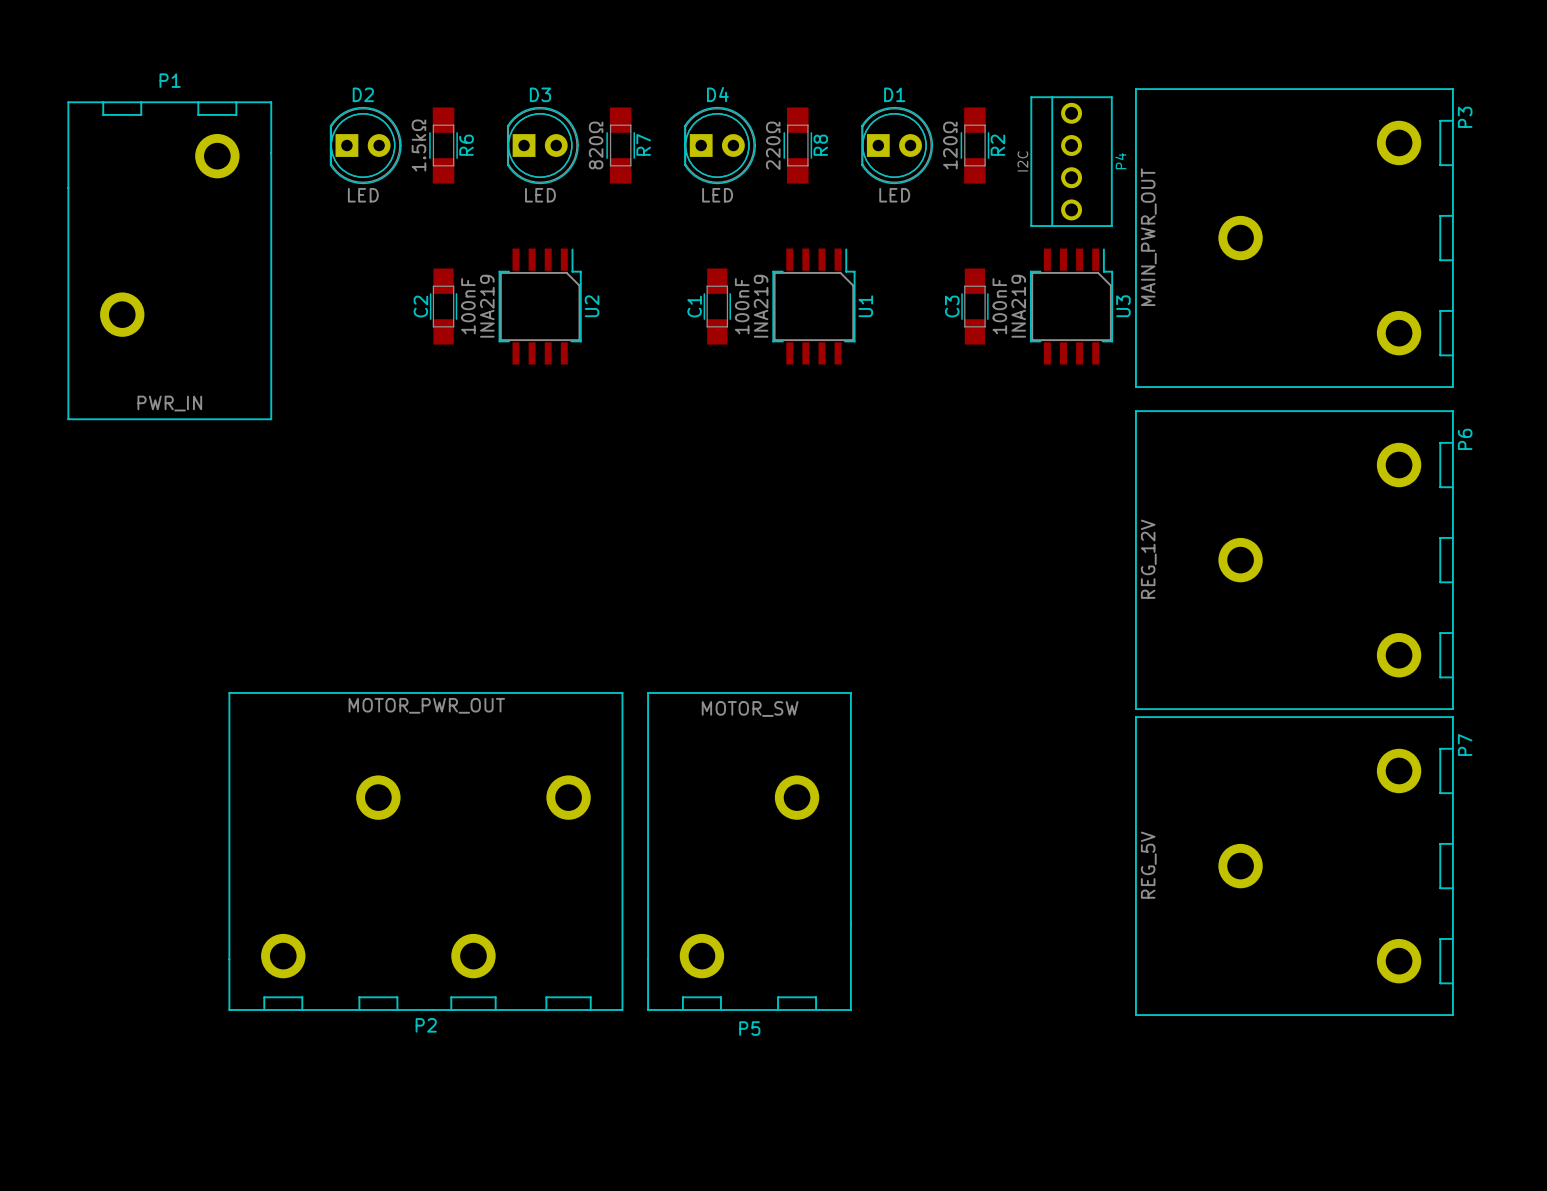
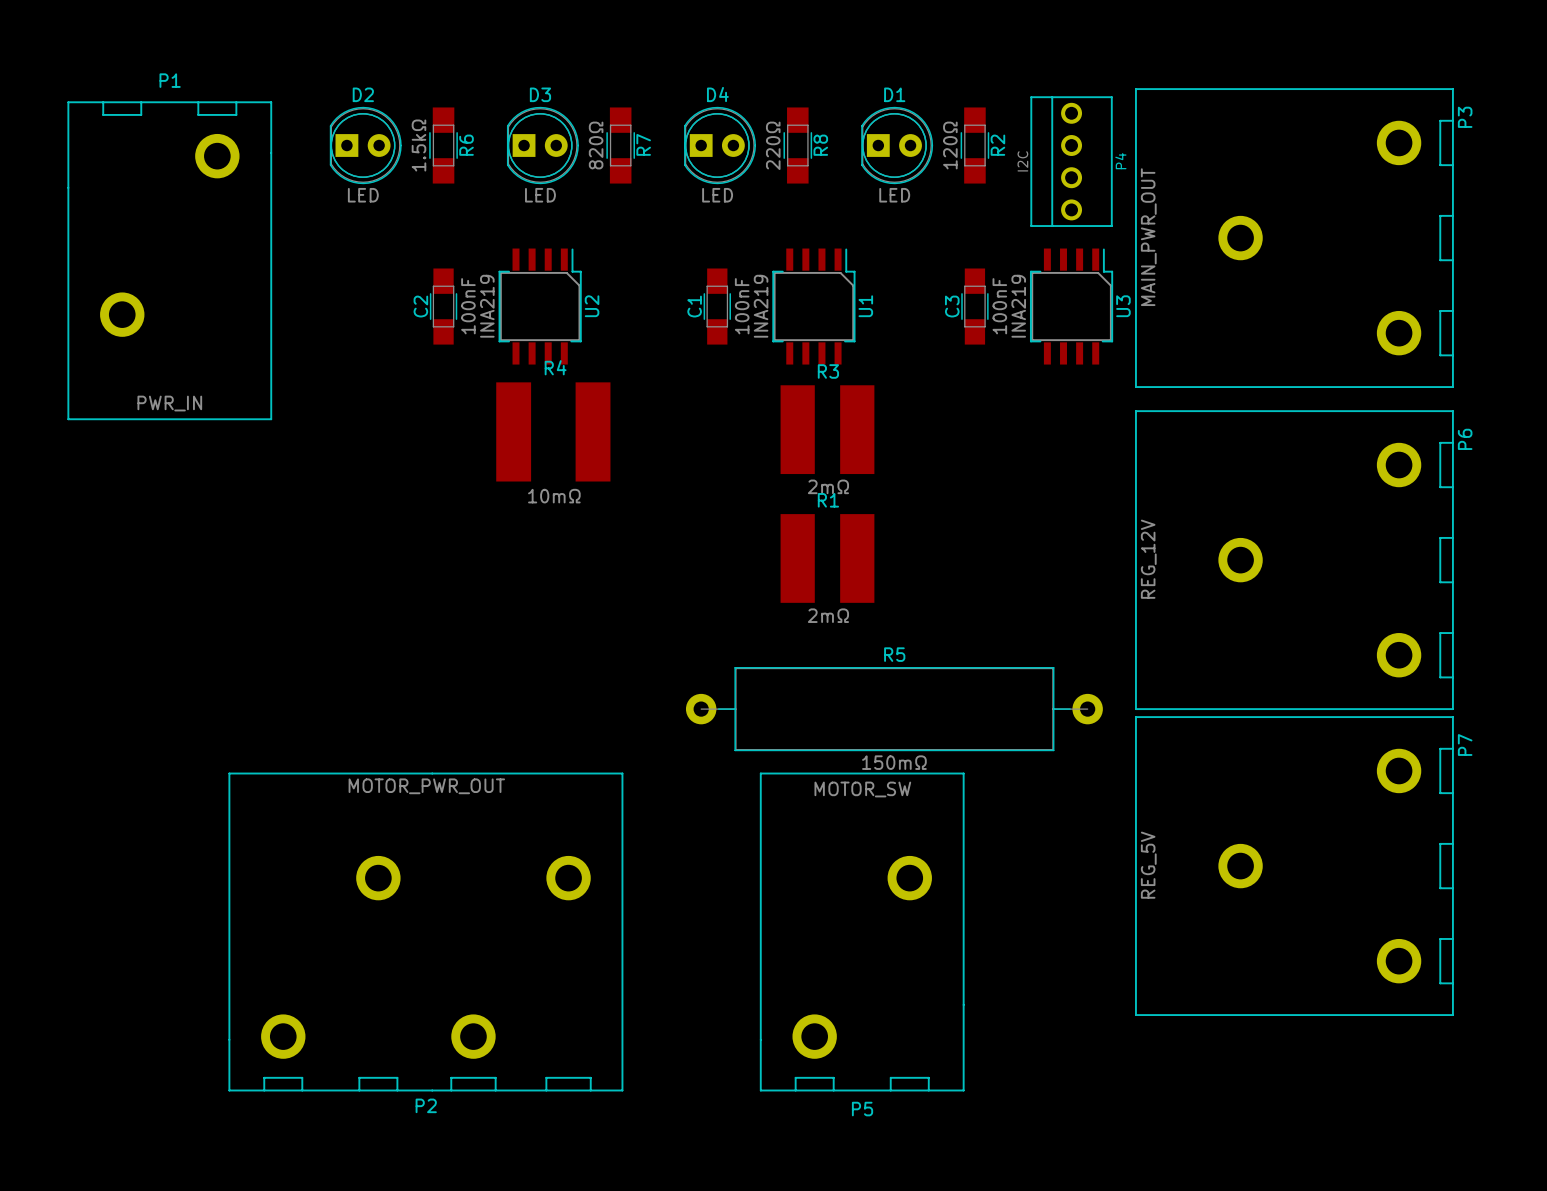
R3: none -> 2mΩ (827, 429)
R4: none -> 10mΩ (553, 431)
R1: none -> 2mΩ (827, 558)
R5: none -> 150mΩ (894, 709)
P2 position: (425, 851) -> (425, 932)
P5 position: (749, 851) -> (862, 932)

